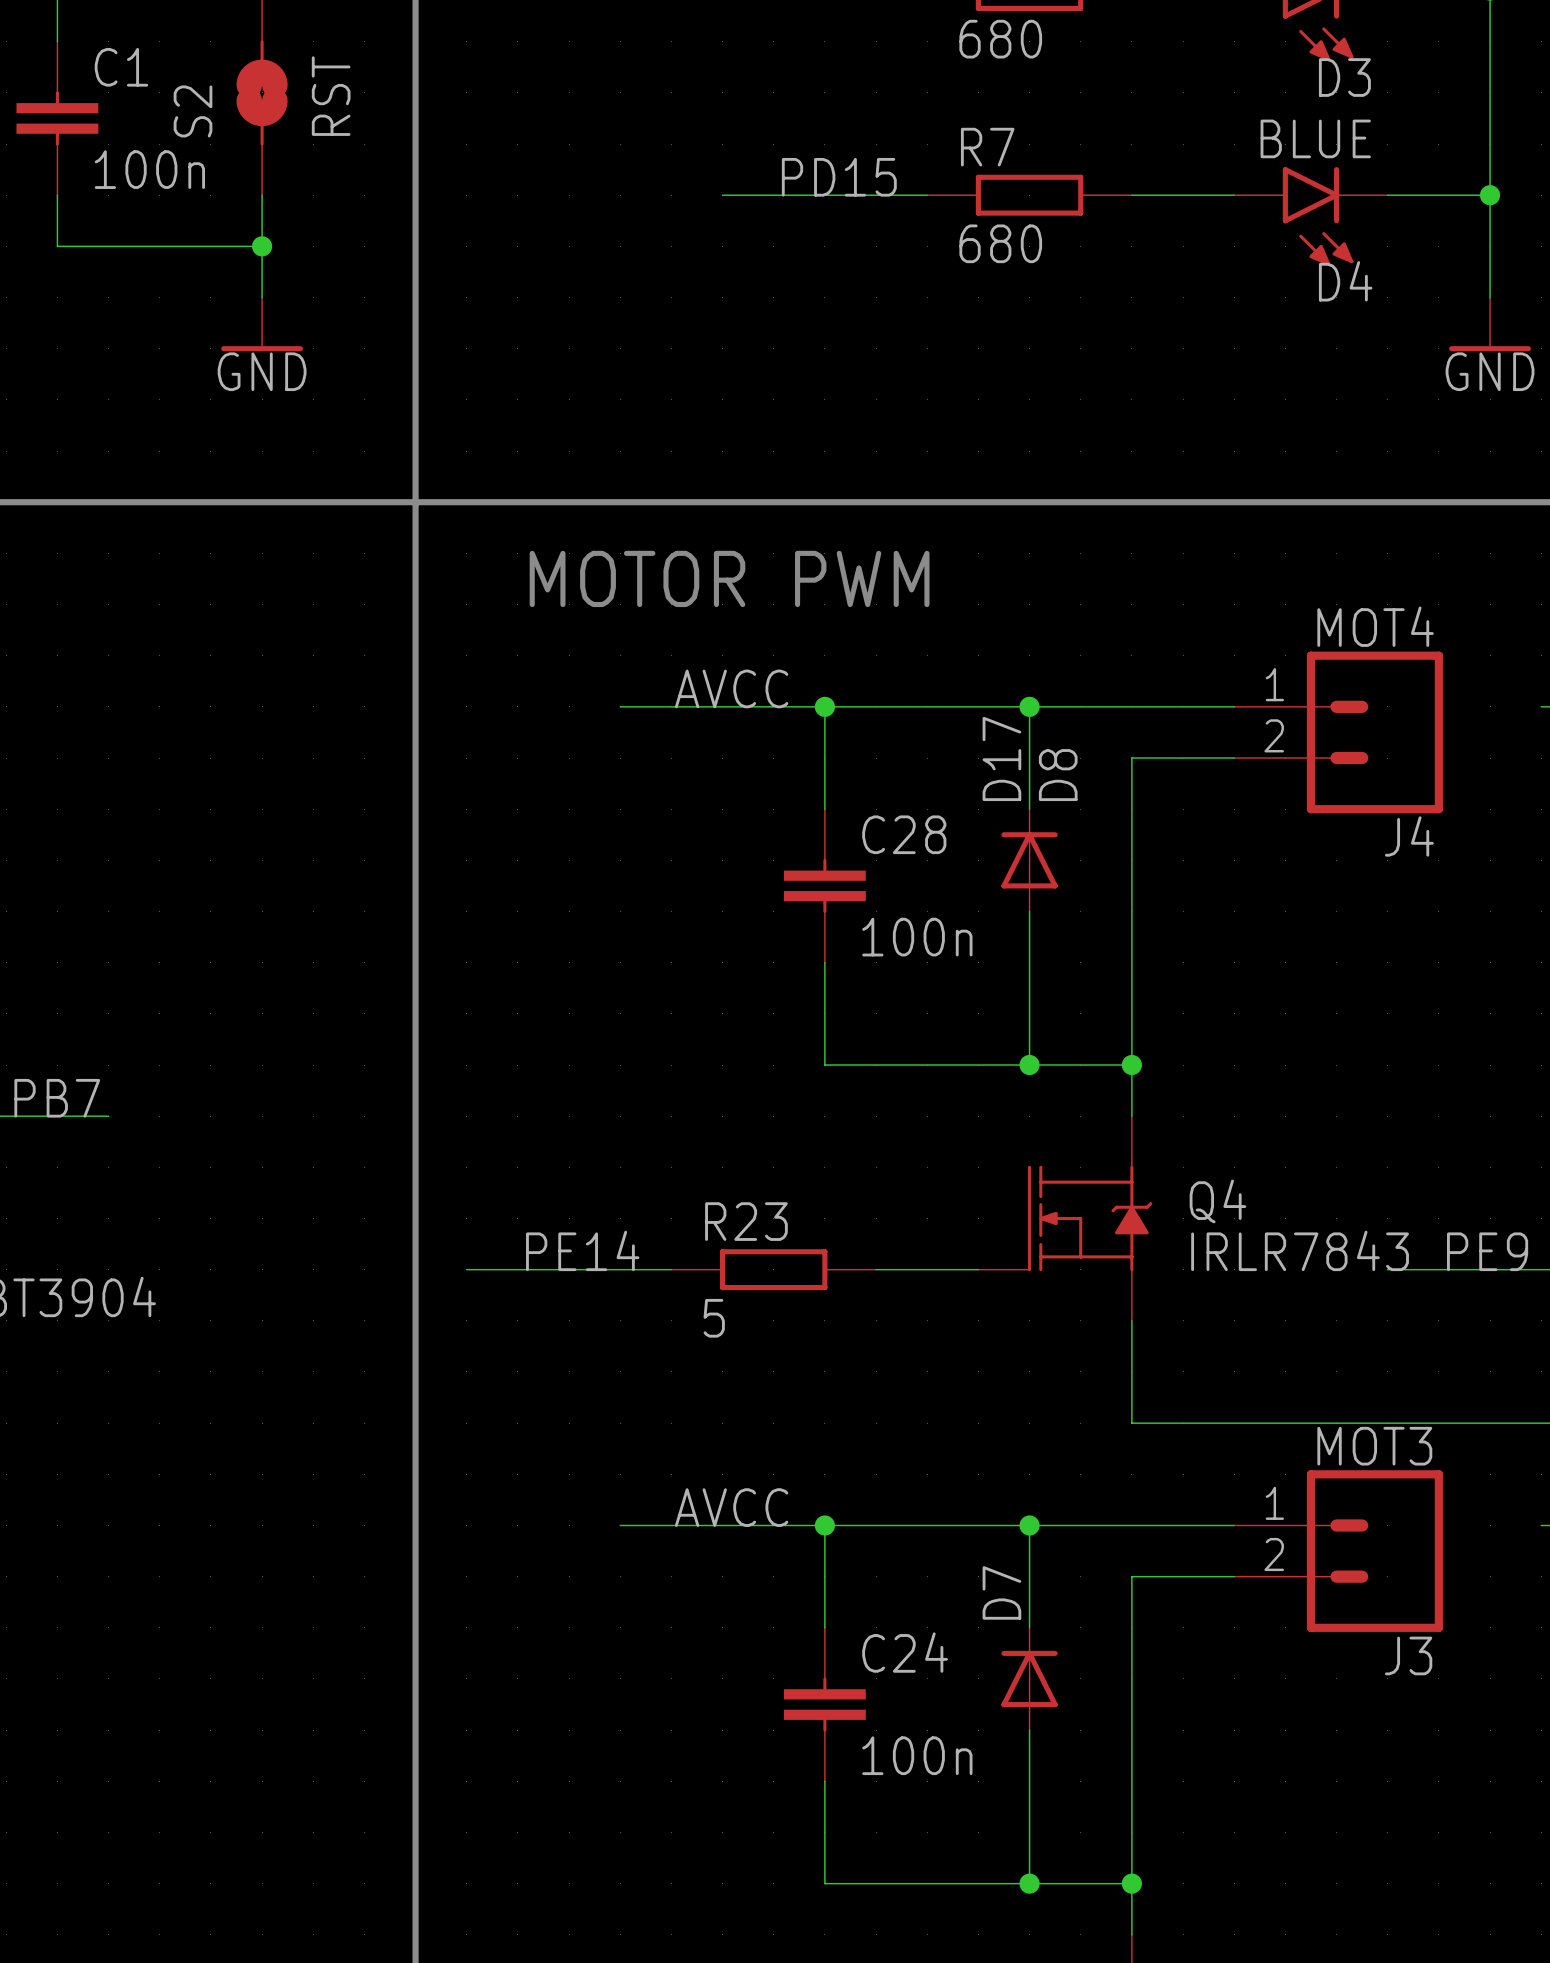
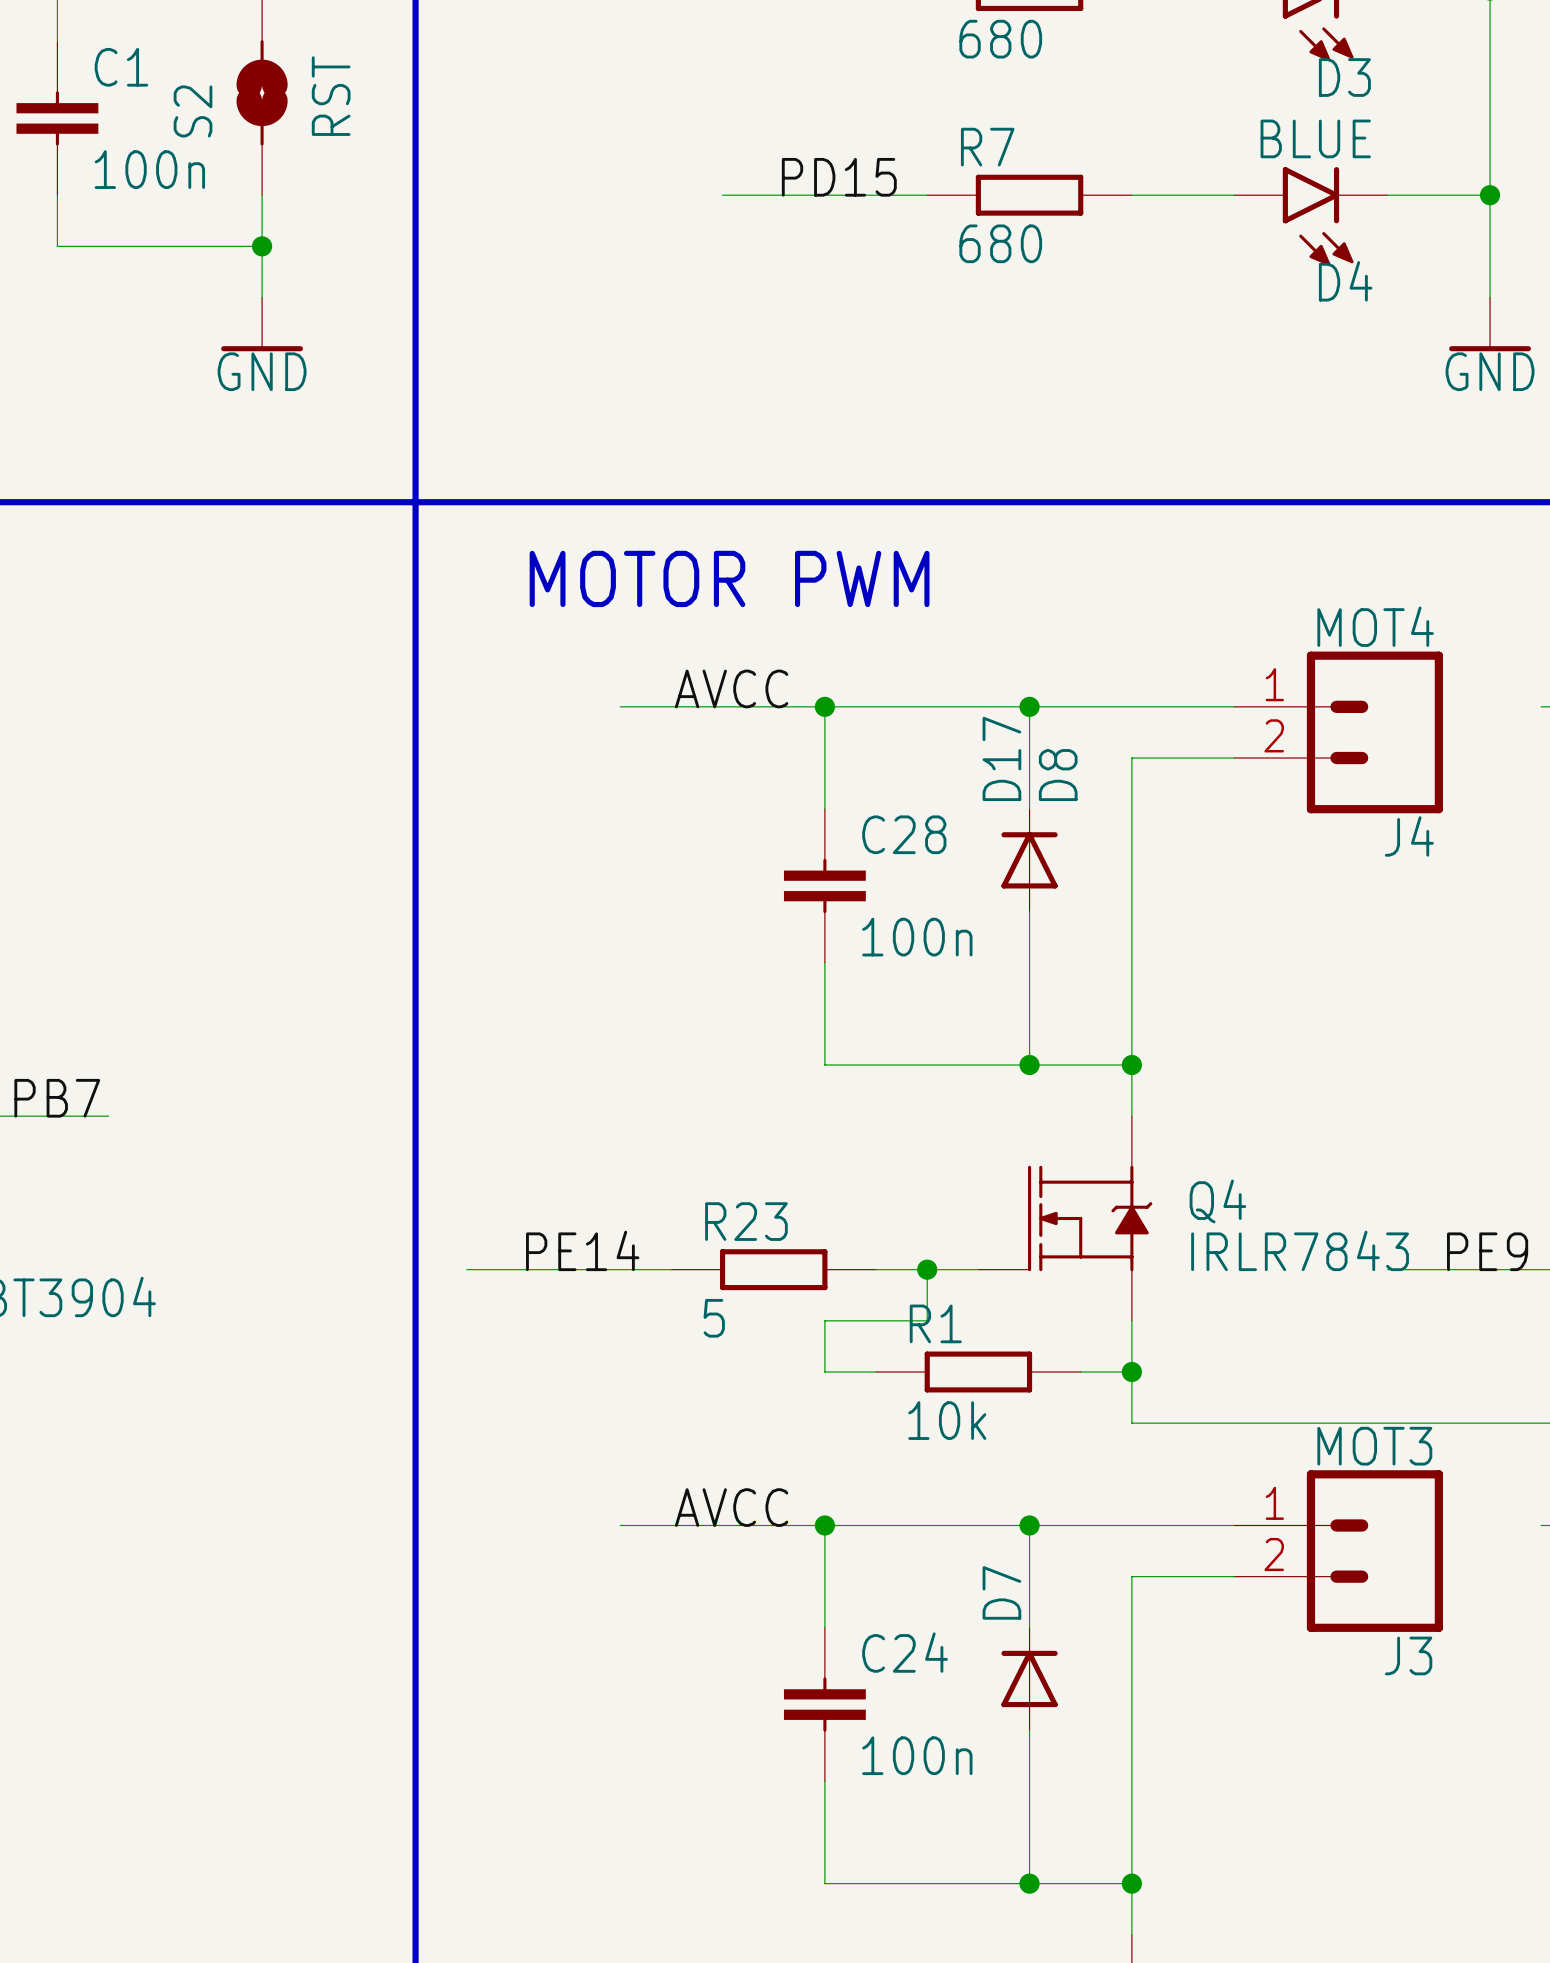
wire: none -> (927, 1269) (927, 1320) (824, 1320) (824, 1371) (876, 1371)
junction: none -> (927, 1269)
R1: none -> 10k (978, 1371)
wire: none -> (1080, 1371) (1131, 1371)
junction: none -> (1131, 1371)

